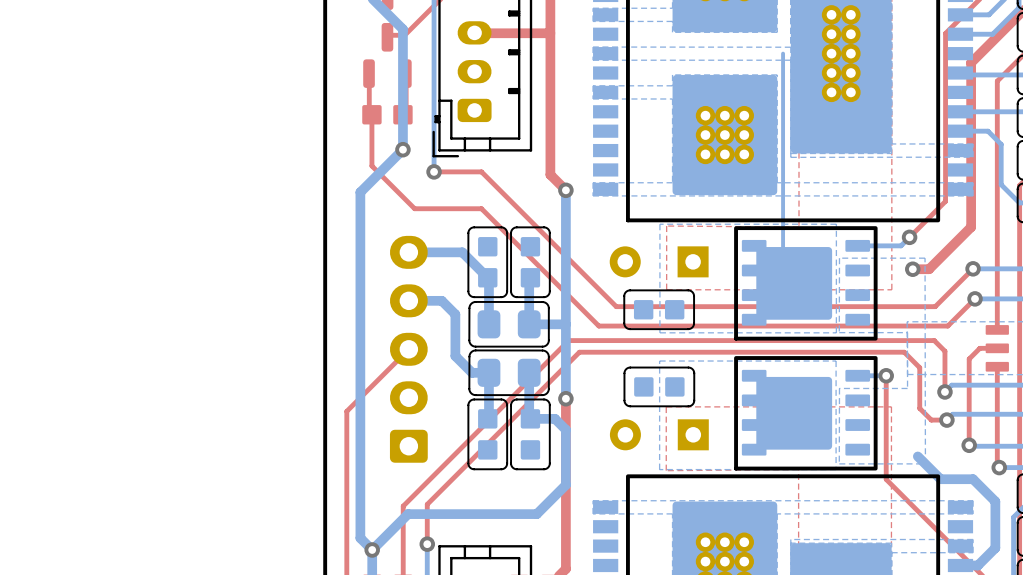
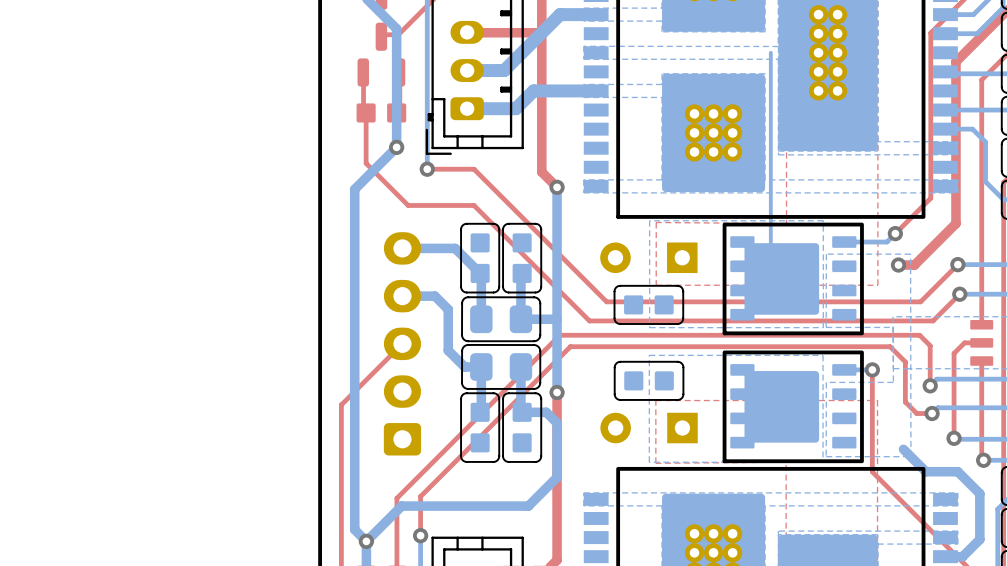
bottom track: none -> (594, 14) (560, 14) (504, 70) (465, 70)
bottom track: none -> (594, 90) (533, 90) (515, 108) (465, 108)

